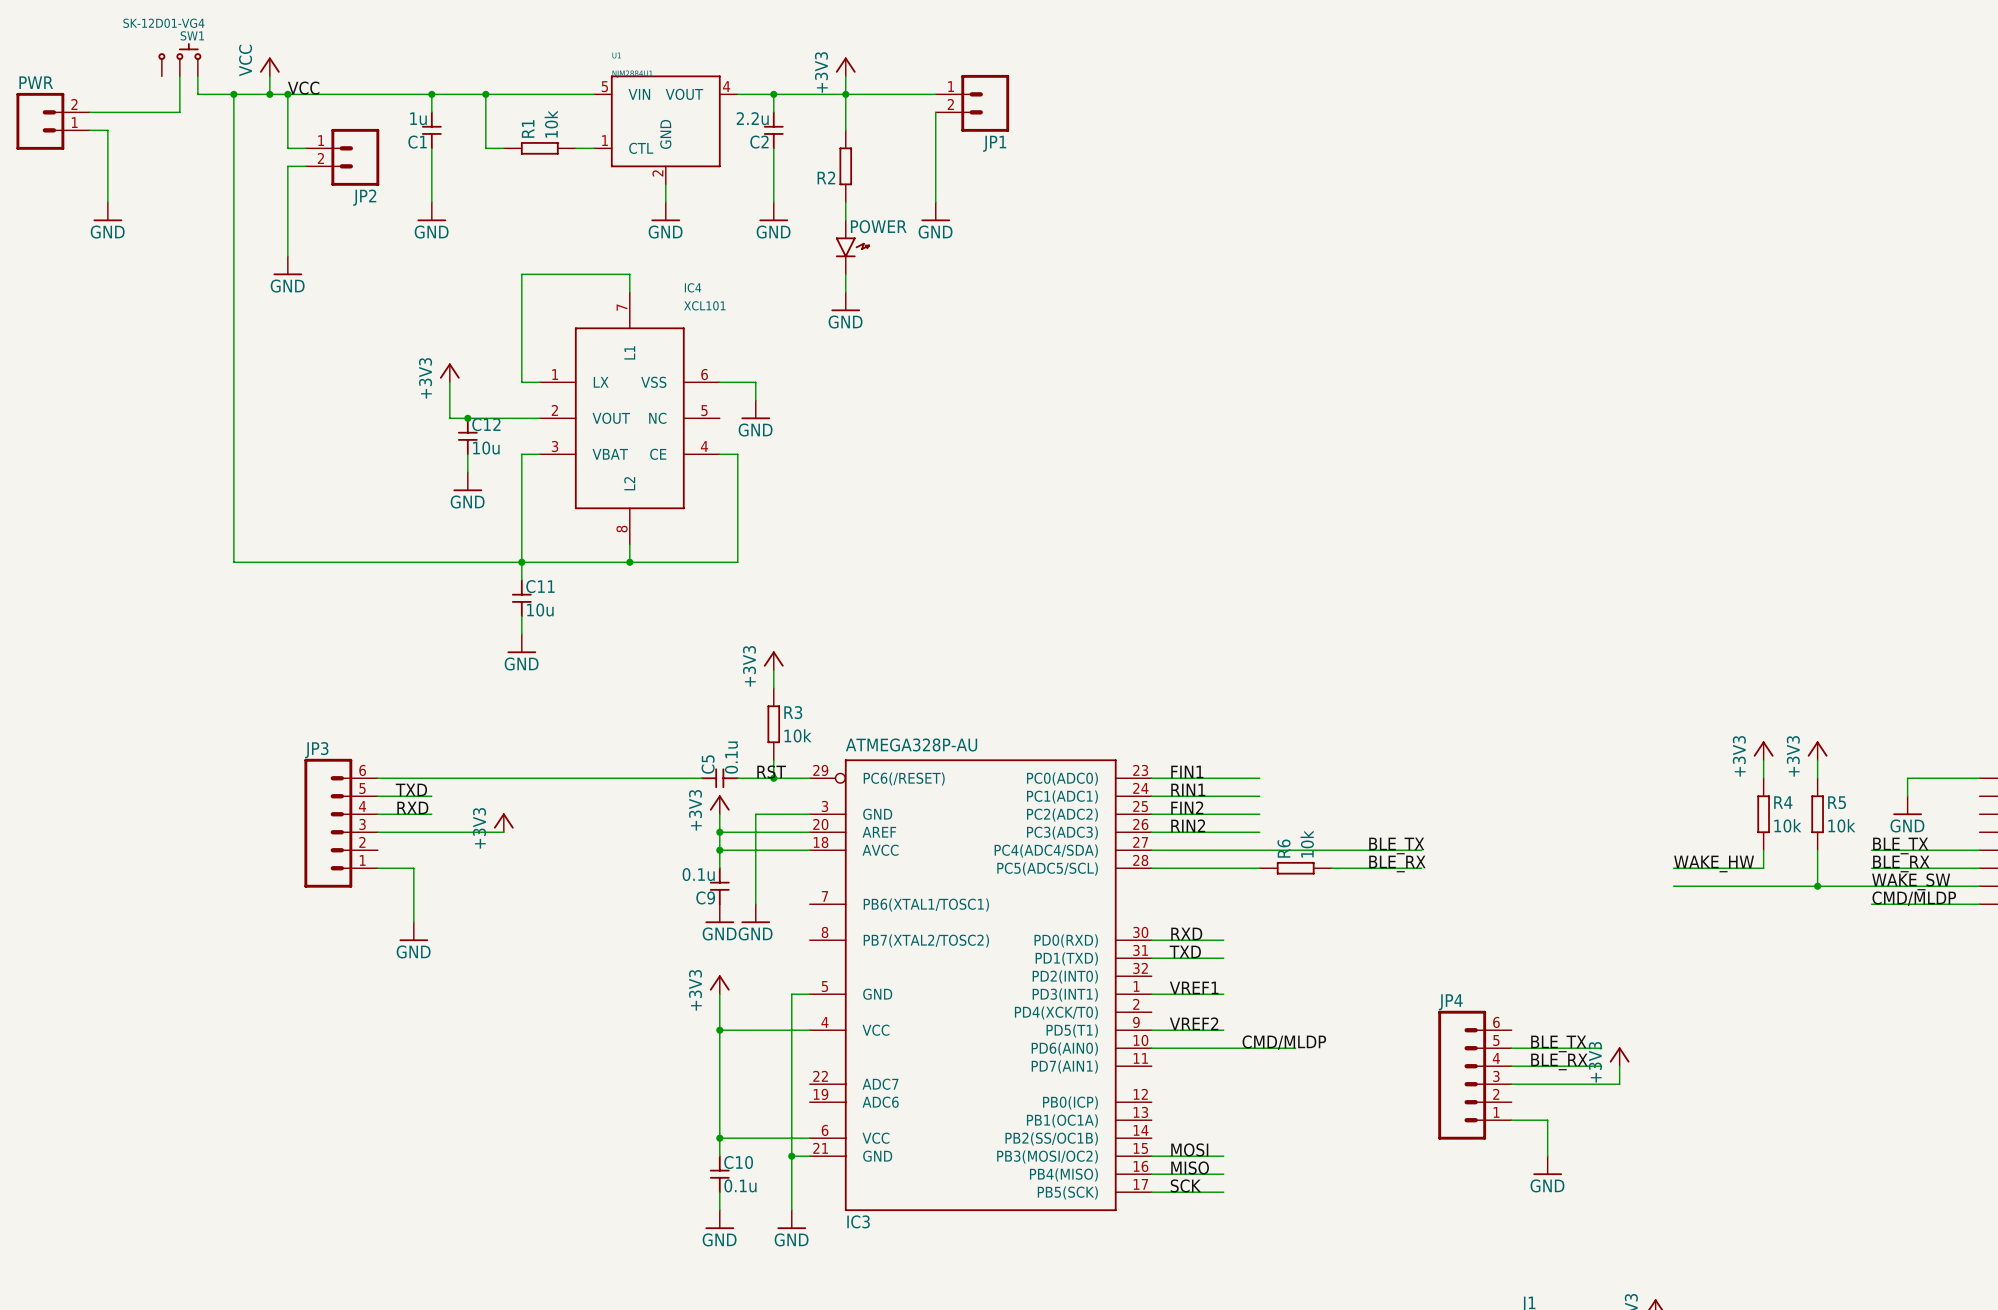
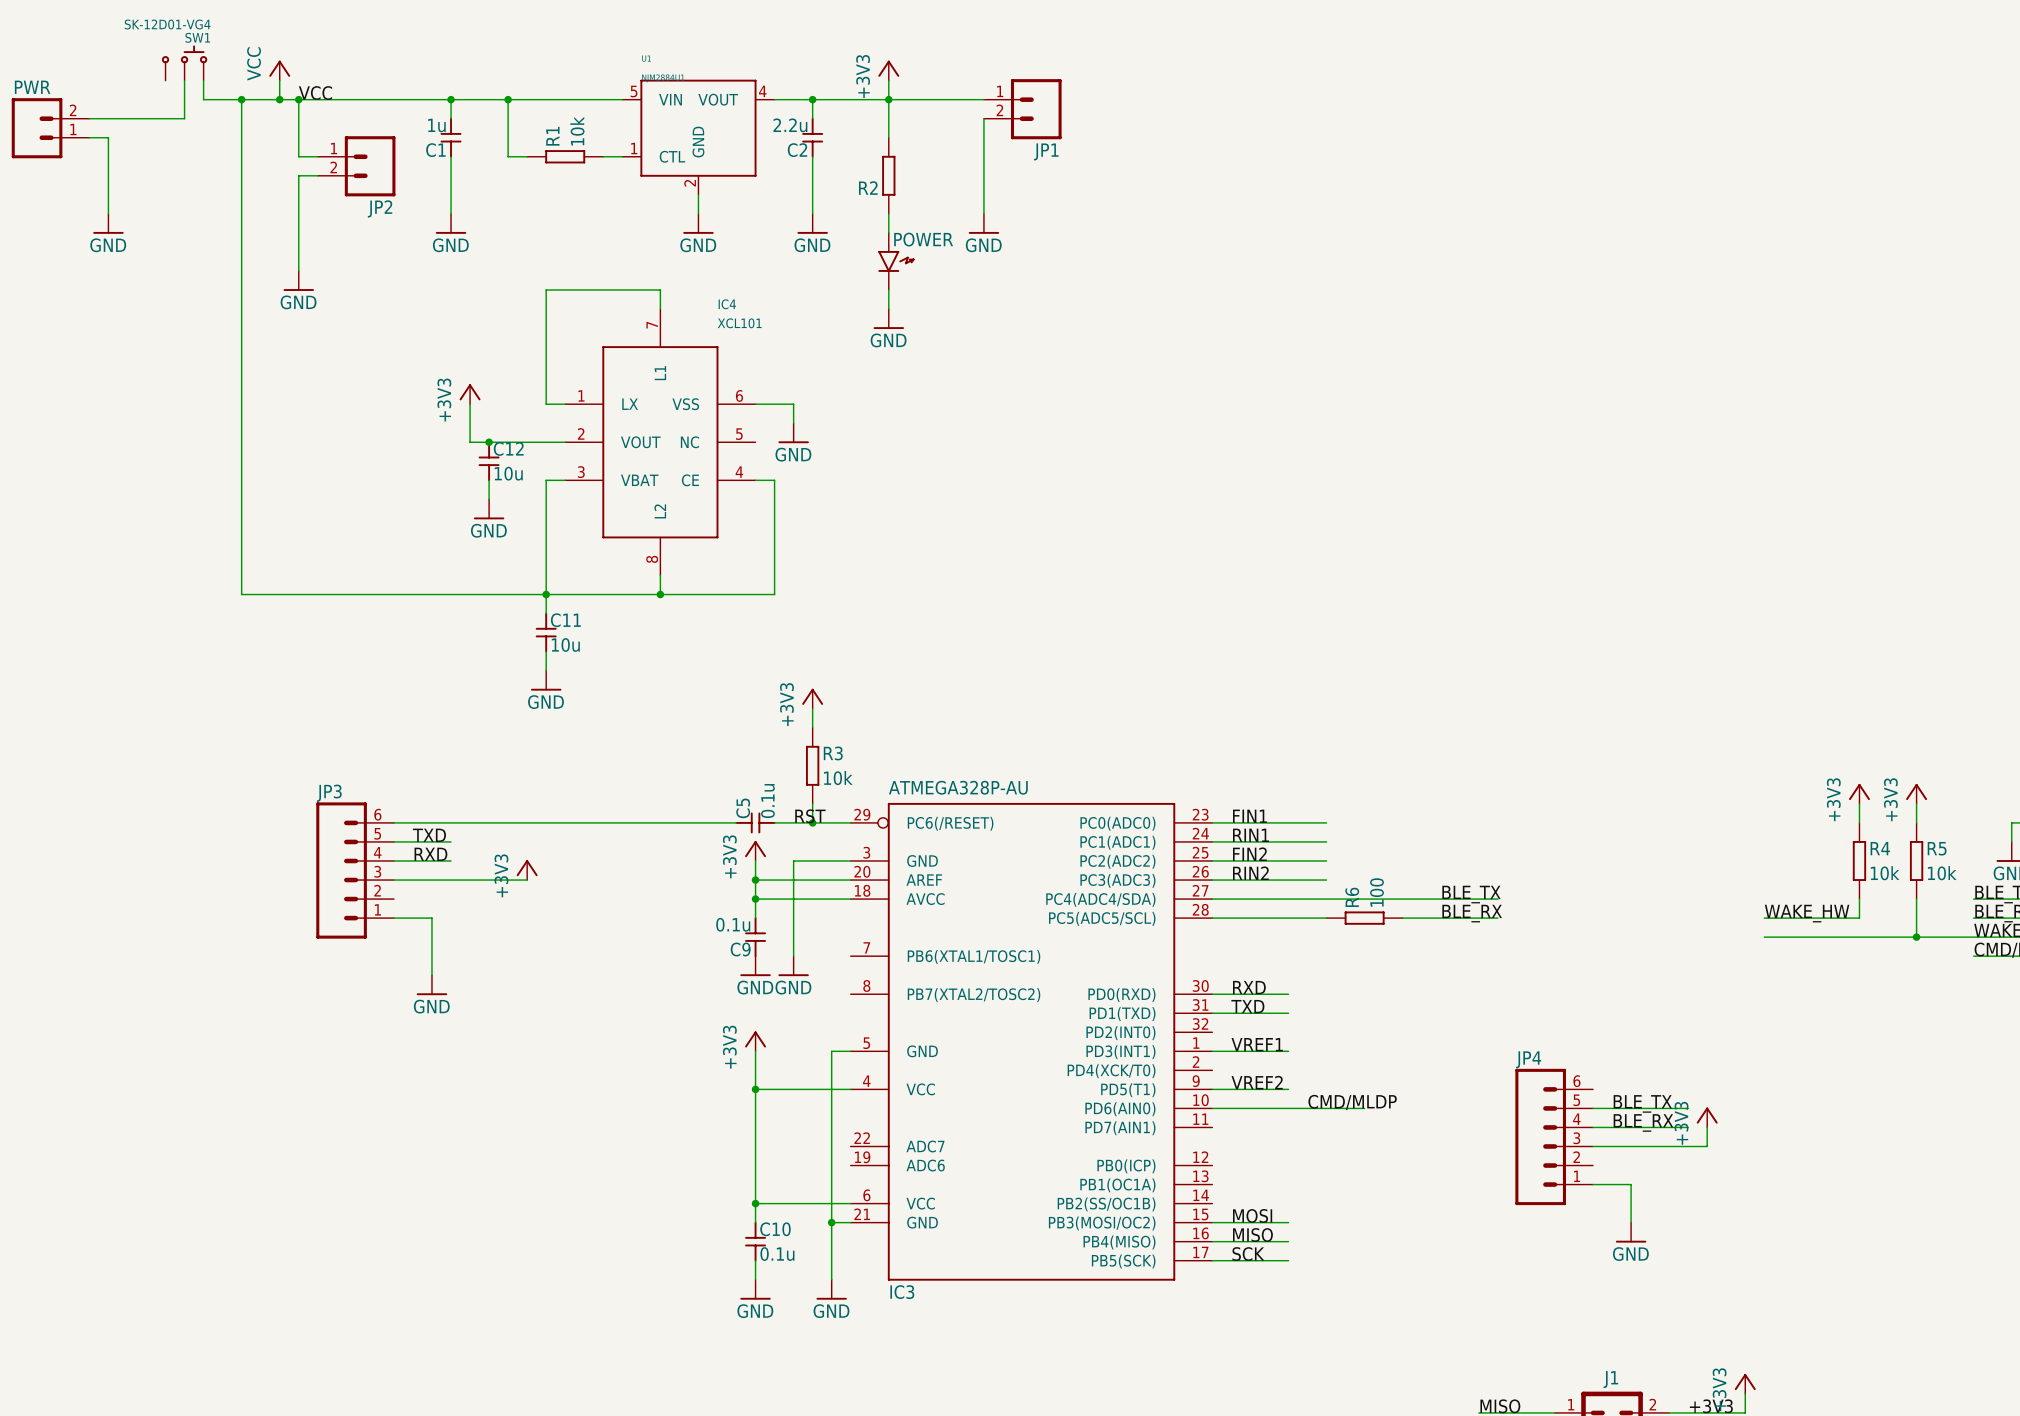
R6 value: 10k (1307, 844) -> 100 (1376, 892)

